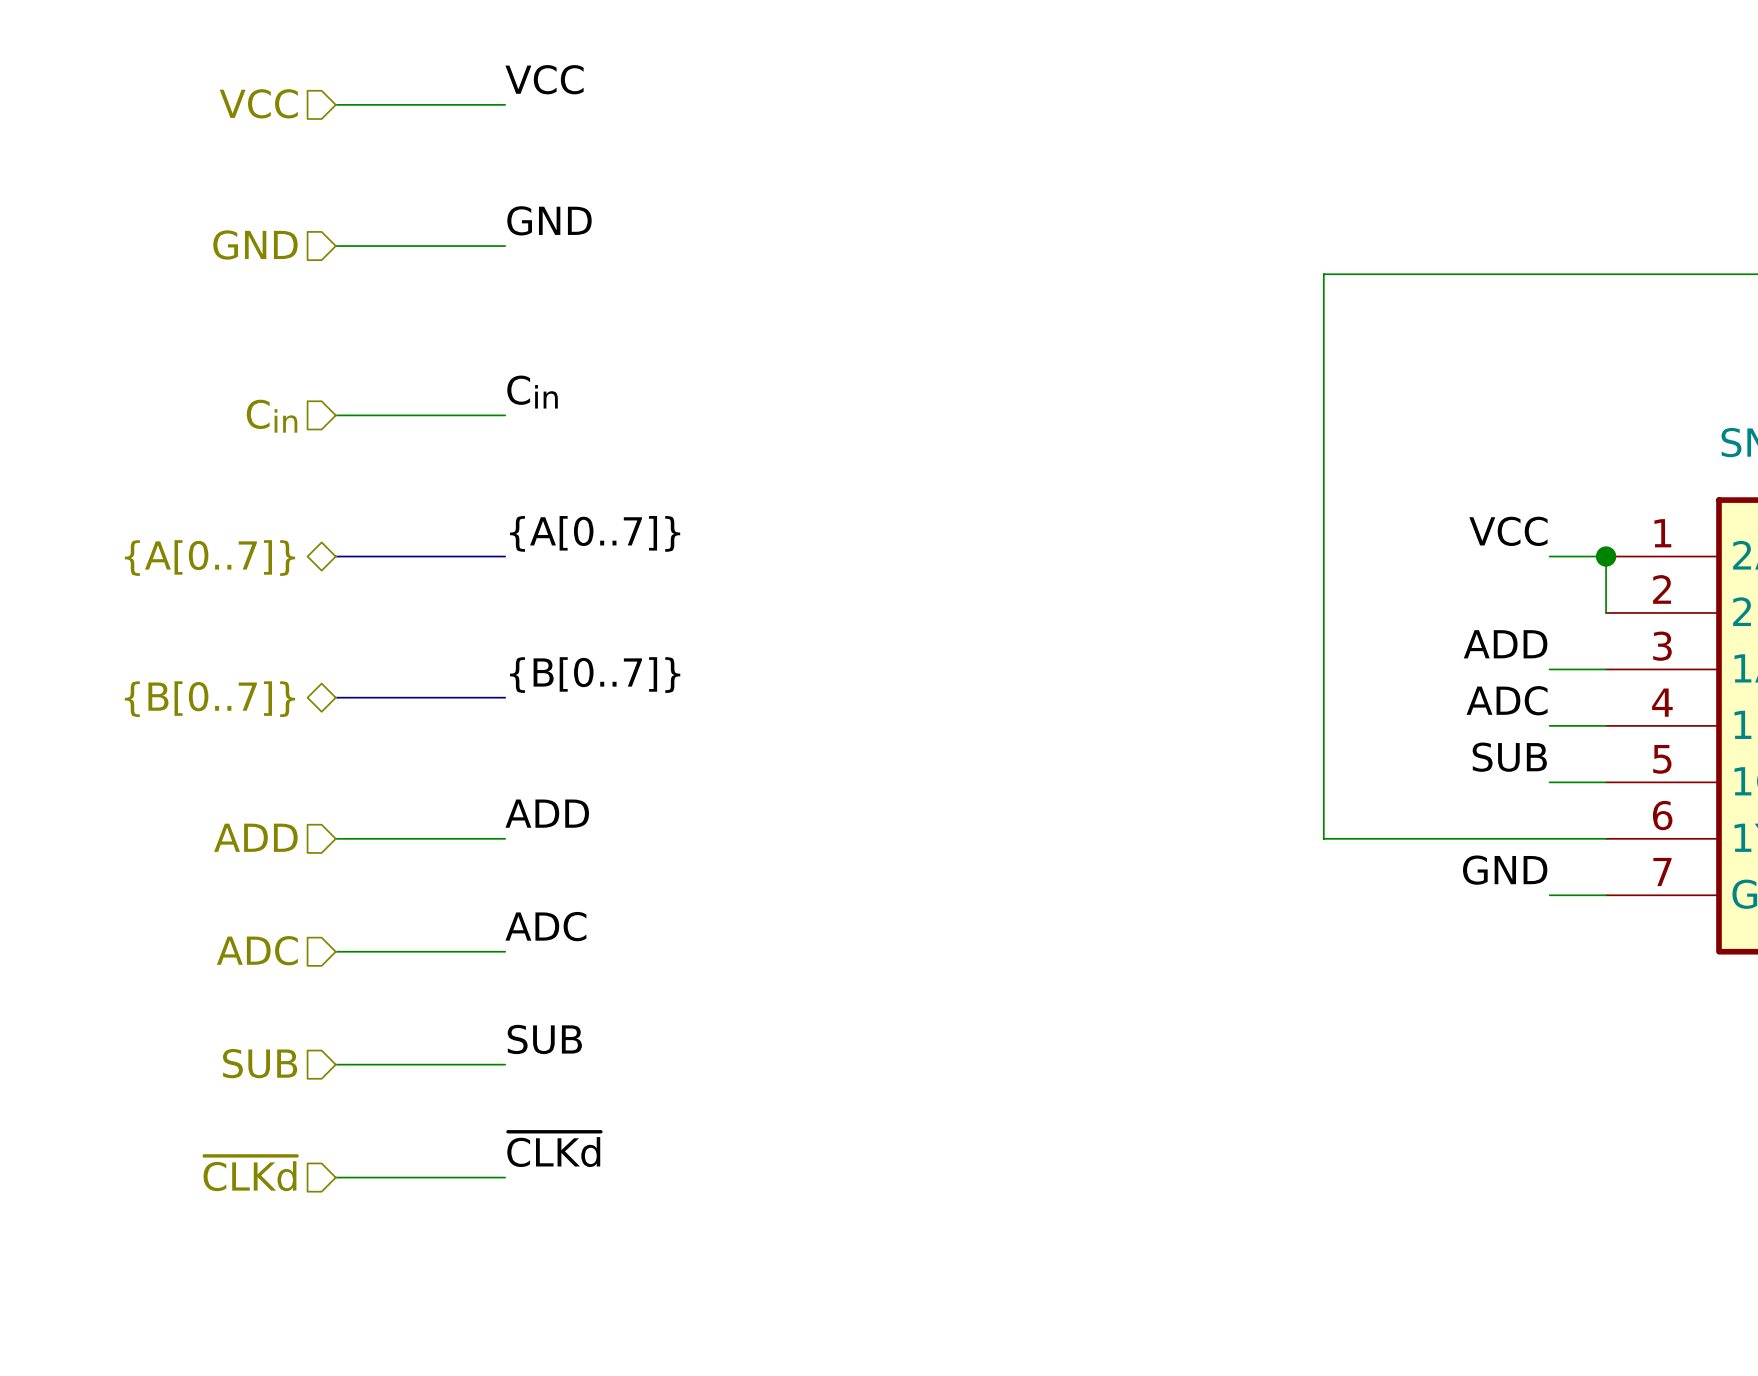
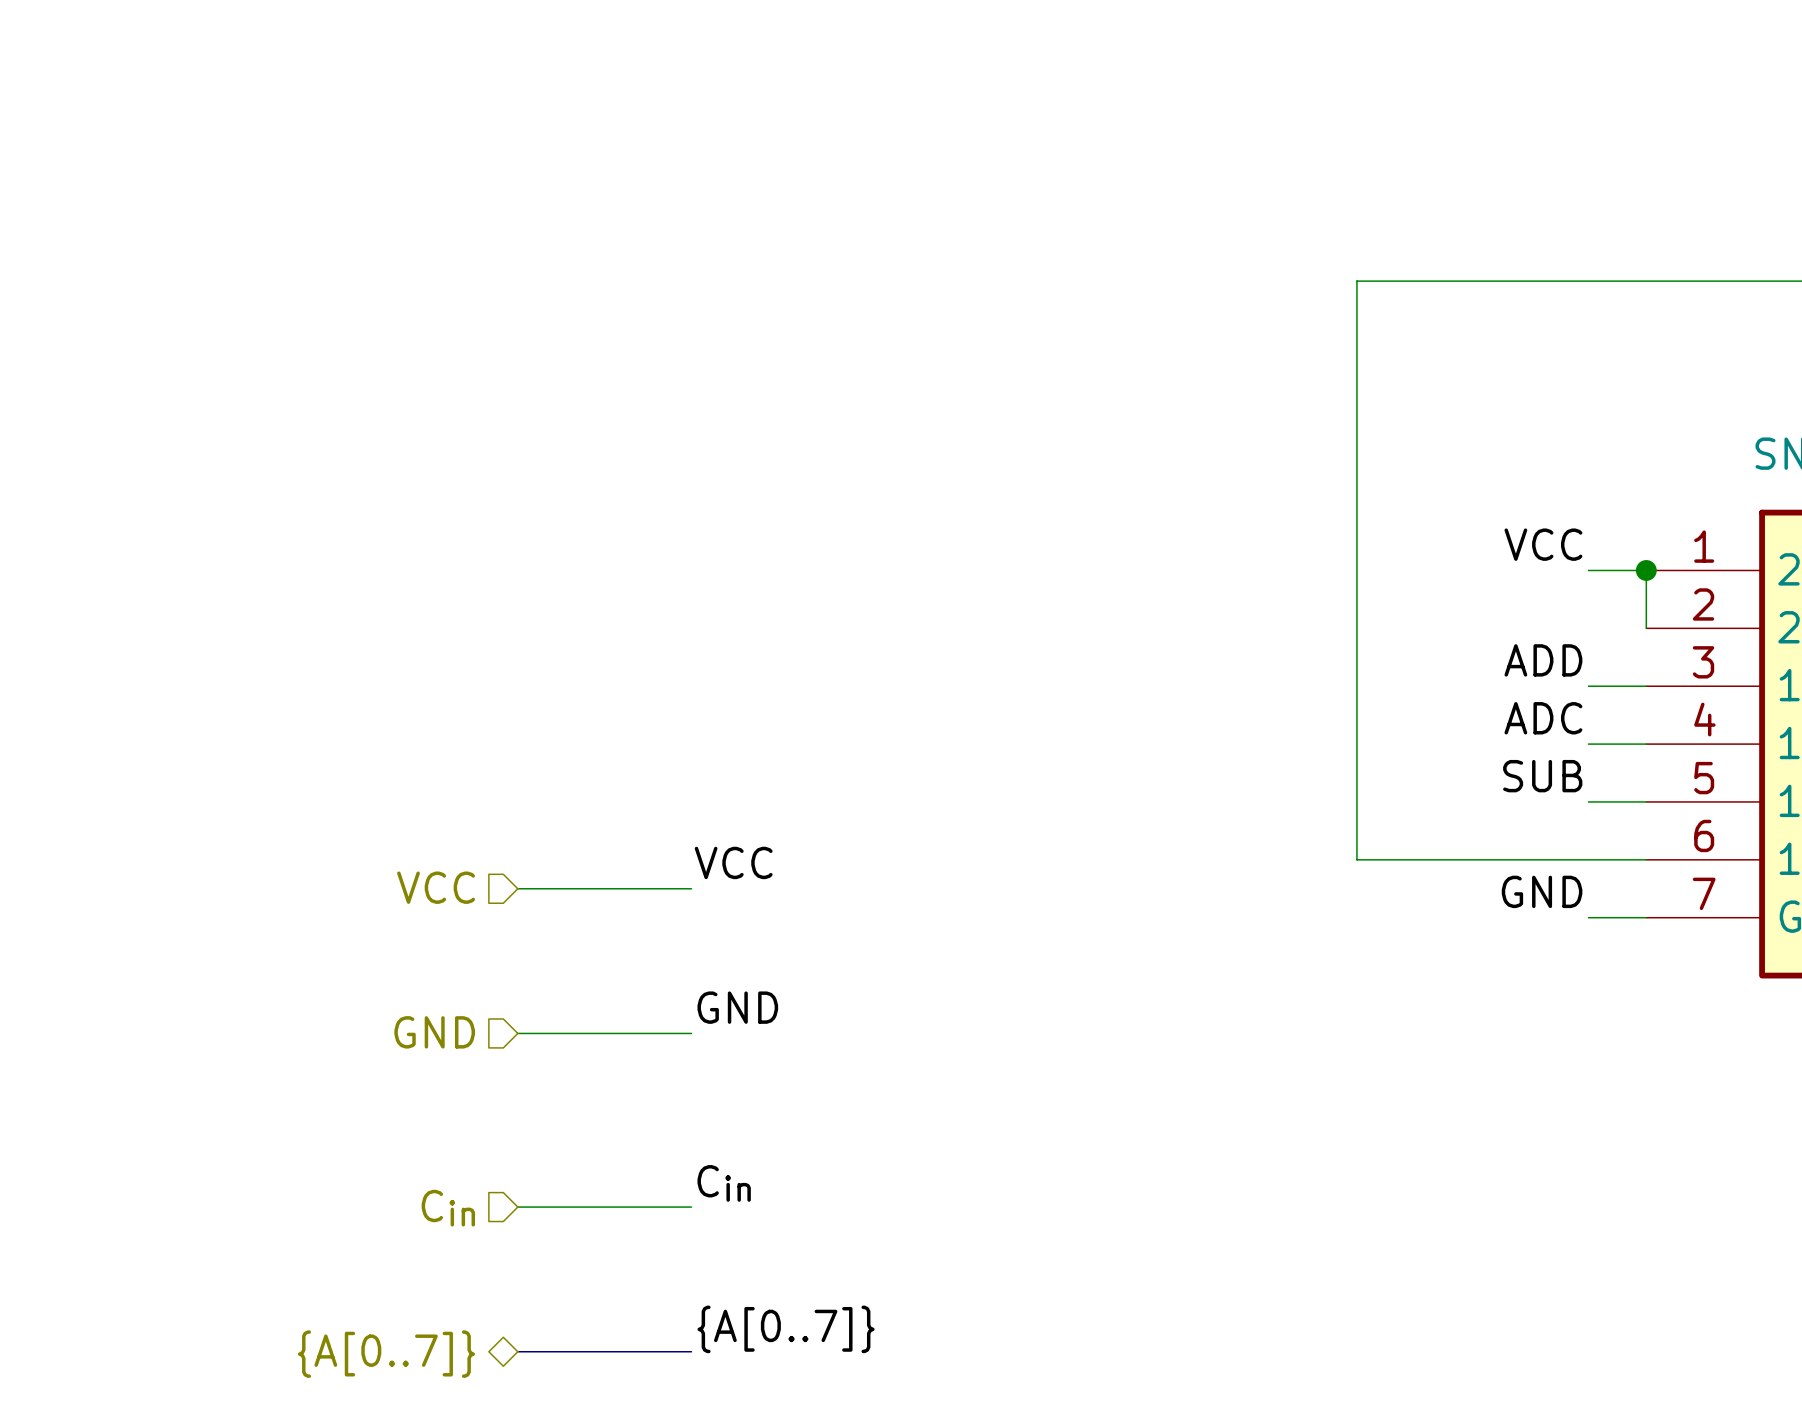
label: VCC (544, 79) -> none
hierarchical label: VCC (258, 103) -> none
wire: (335, 104) (505, 104) -> none
label: GND (549, 220) -> none
hierarchical label: GND (255, 244) -> none
wire: (335, 246) (505, 246) -> none
label: Cin (532, 392) -> none
wire: (335, 415) (505, 415) -> none
hierarchical label: Cin (272, 416) -> none
label: {A[0..7]} (595, 533) -> none
bus: (335, 556) (505, 556) -> none
hierarchical label: {A[0..7]} (210, 558) -> none
label: {B[0..7]} (595, 675) -> none
bus: (335, 697) (505, 697) -> none
hierarchical label: {B[0..7]} (209, 699) -> none
label: ADD (547, 813) -> none
hierarchical label: ADD (255, 837) -> none
wire: (335, 838) (505, 838) -> (517, 888) (691, 888)
label: none -> VCC (733, 862)
hierarchical label: none -> VCC (436, 887)
label: ADC (545, 926) -> none
hierarchical label: ADC (257, 950) -> none
wire: (335, 951) (505, 951) -> (517, 1033) (691, 1033)
label: none -> GND (737, 1007)
hierarchical label: none -> GND (434, 1032)
label: SUB (544, 1039) -> none
hierarchical label: SUB (260, 1063) -> none
wire: (335, 1064) (505, 1064) -> none
label: ~{CLKd} (554, 1149) -> none
label: none -> Cin (724, 1183)
hierarchical label: ~{CLKd} (250, 1173) -> none
wire: (335, 1177) (505, 1177) -> (691, 1207) (517, 1207)
hierarchical label: none -> Cin (448, 1208)
label: none -> {A[0..7]} (786, 1329)
bus: none -> (517, 1351) (691, 1351)
hierarchical label: none -> {A[0..7]} (386, 1354)

